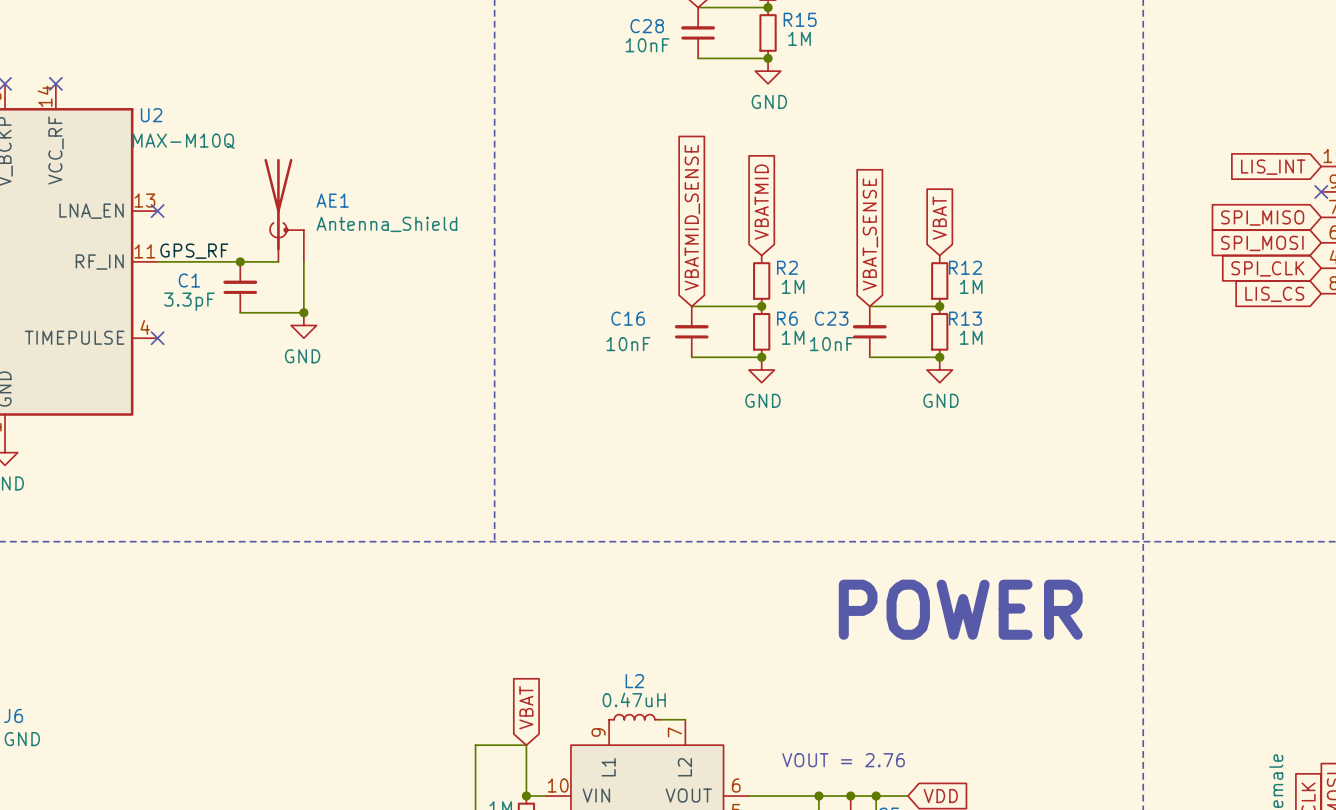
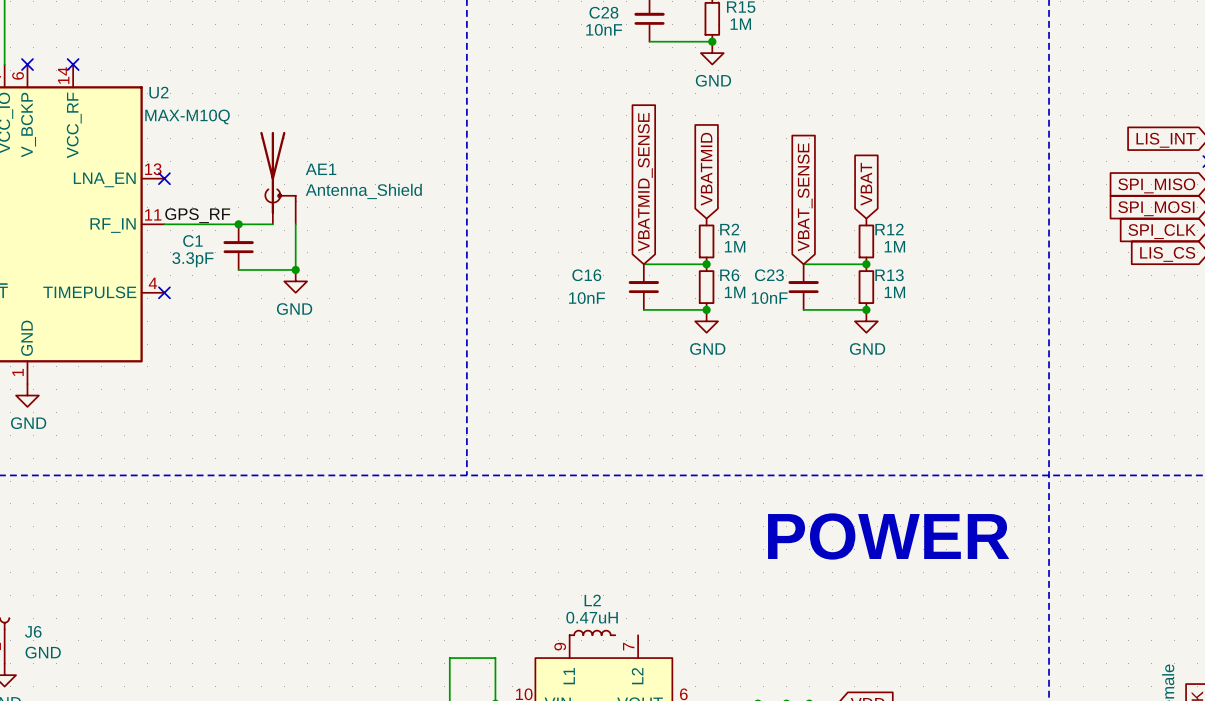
global label: VBAT (526, 707) -> none
wire: (659, 719) (685, 719) -> none
text: VOUT = 2.76 (843, 760) -> none

